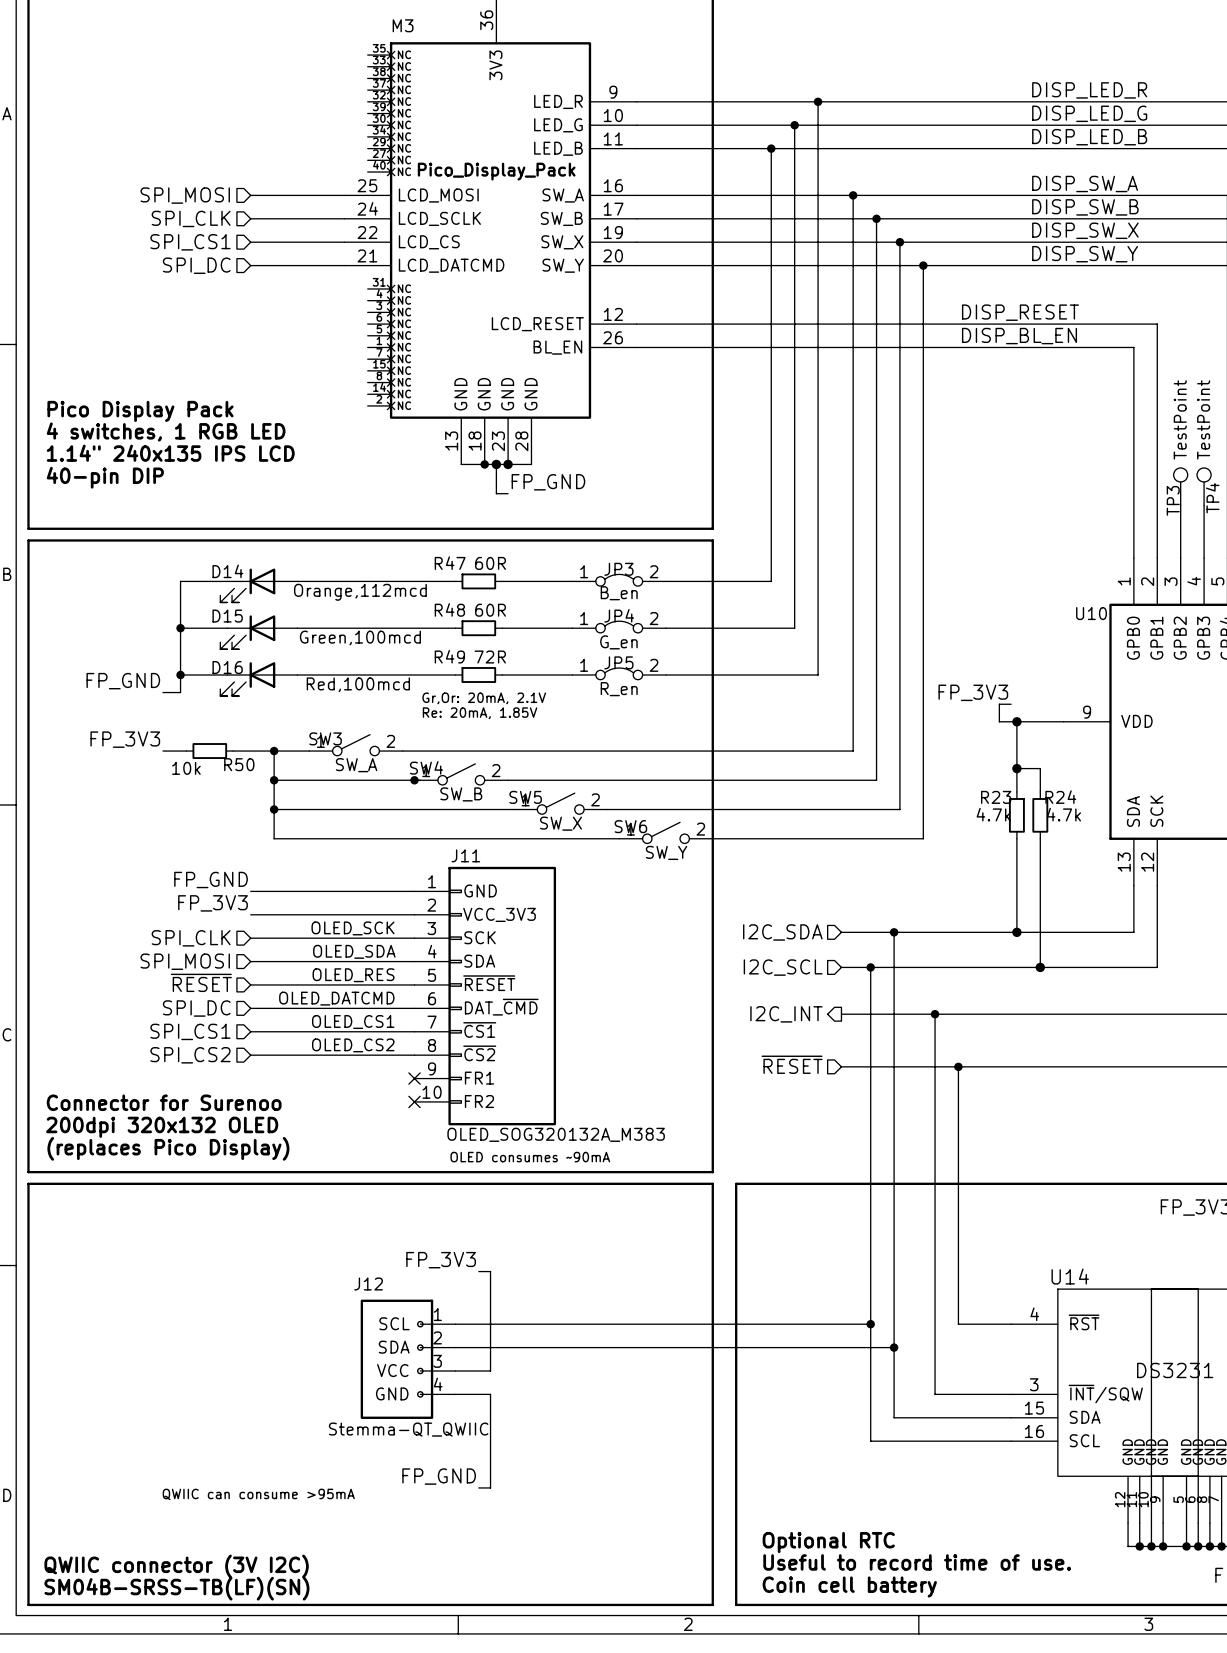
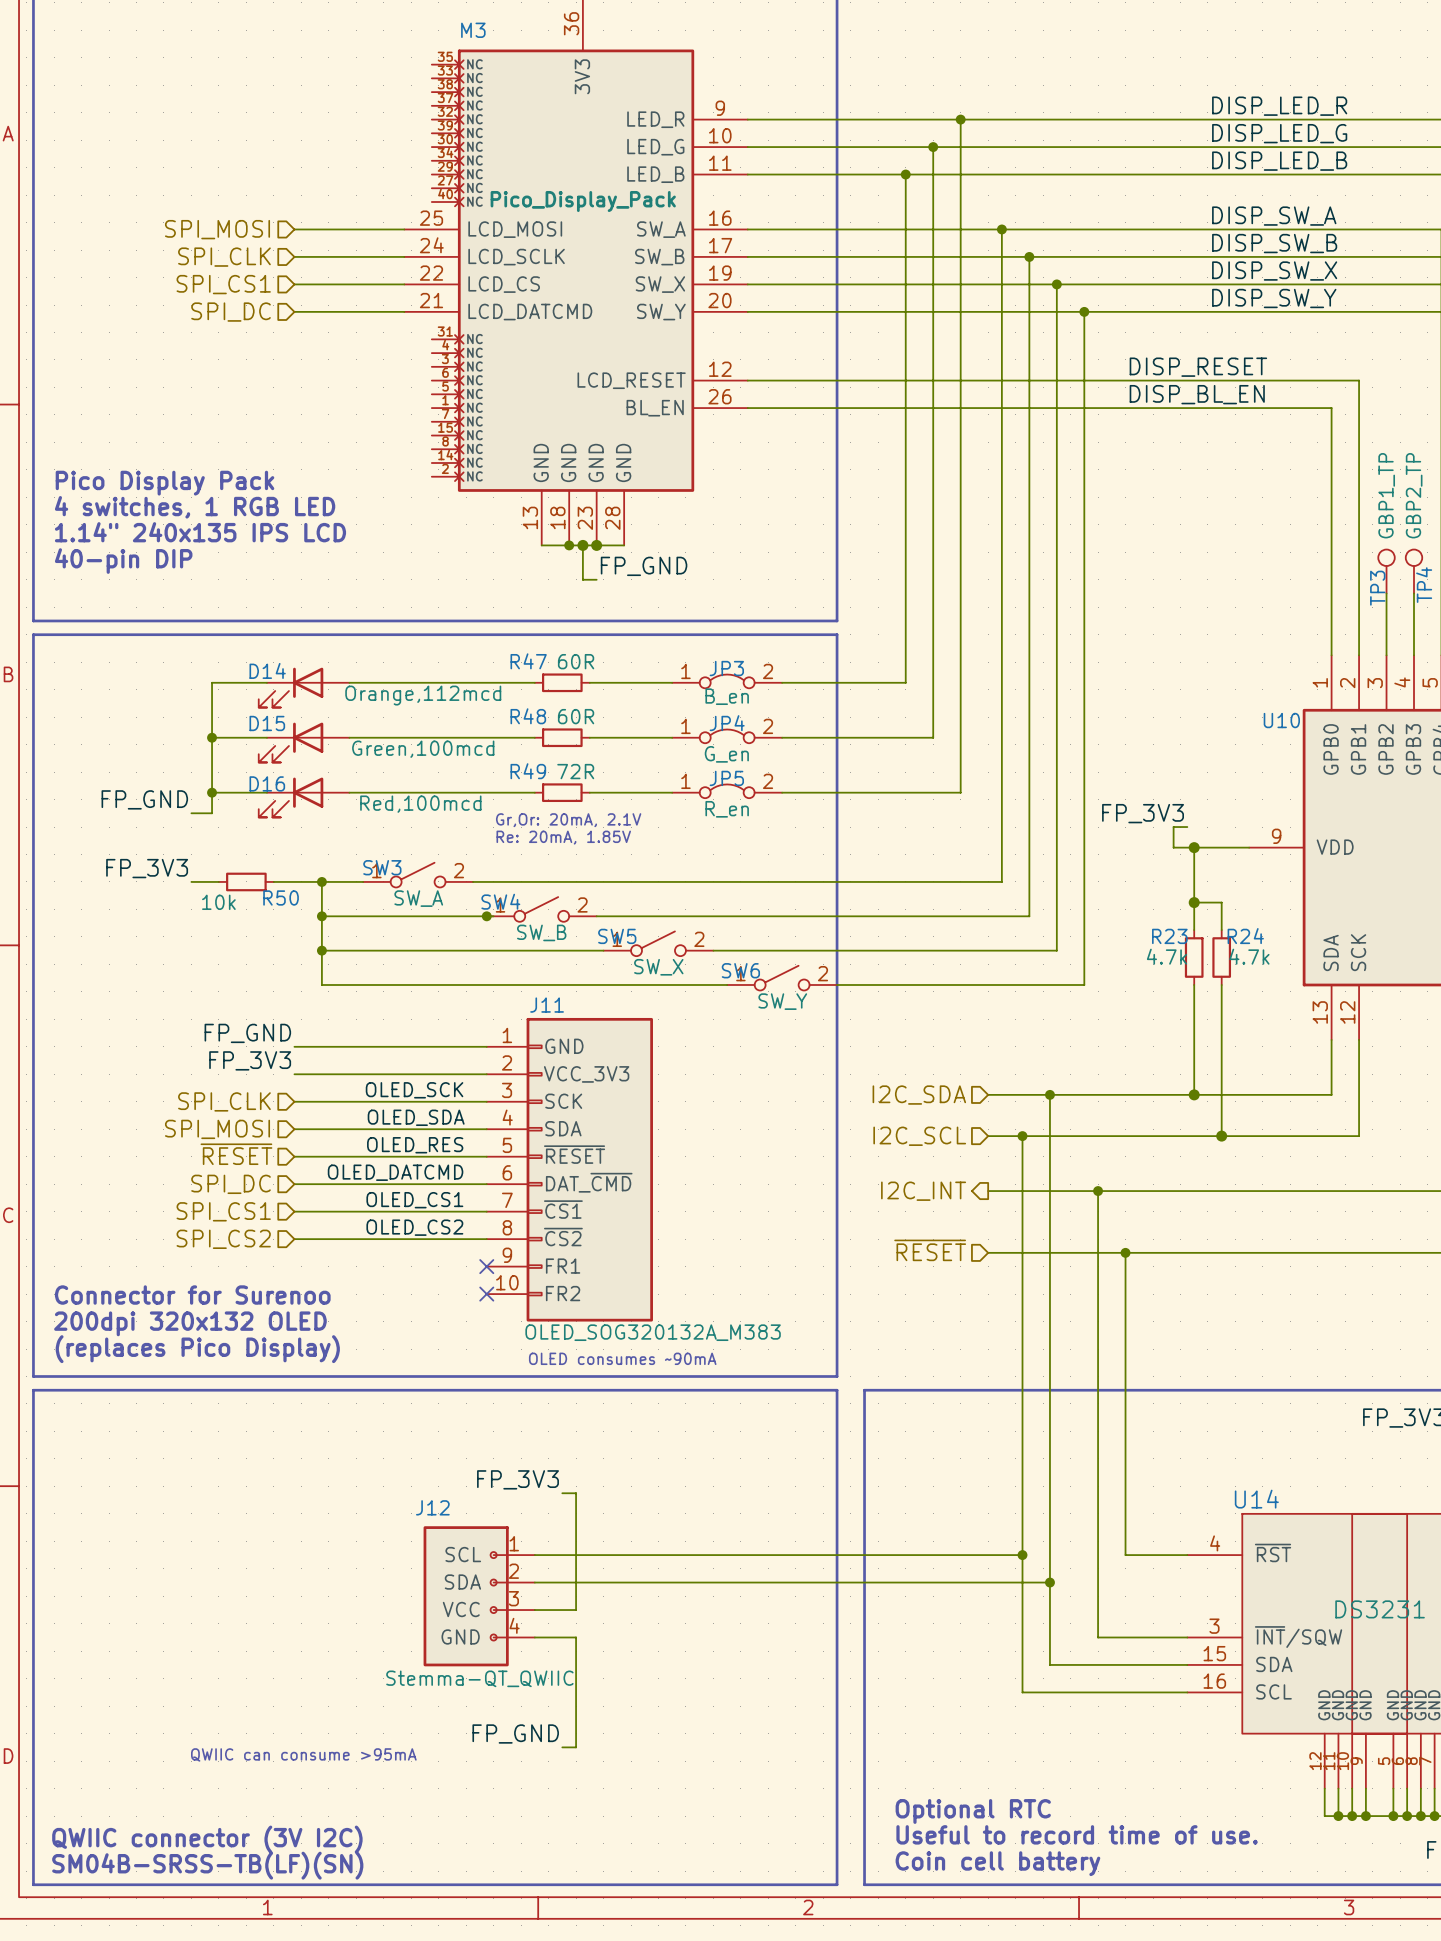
TP3 value: TestPoint (1180, 419) -> GBP1_TP (1386, 495)
TP4 value: TestPoint (1203, 419) -> GBP2_TP (1414, 495)

